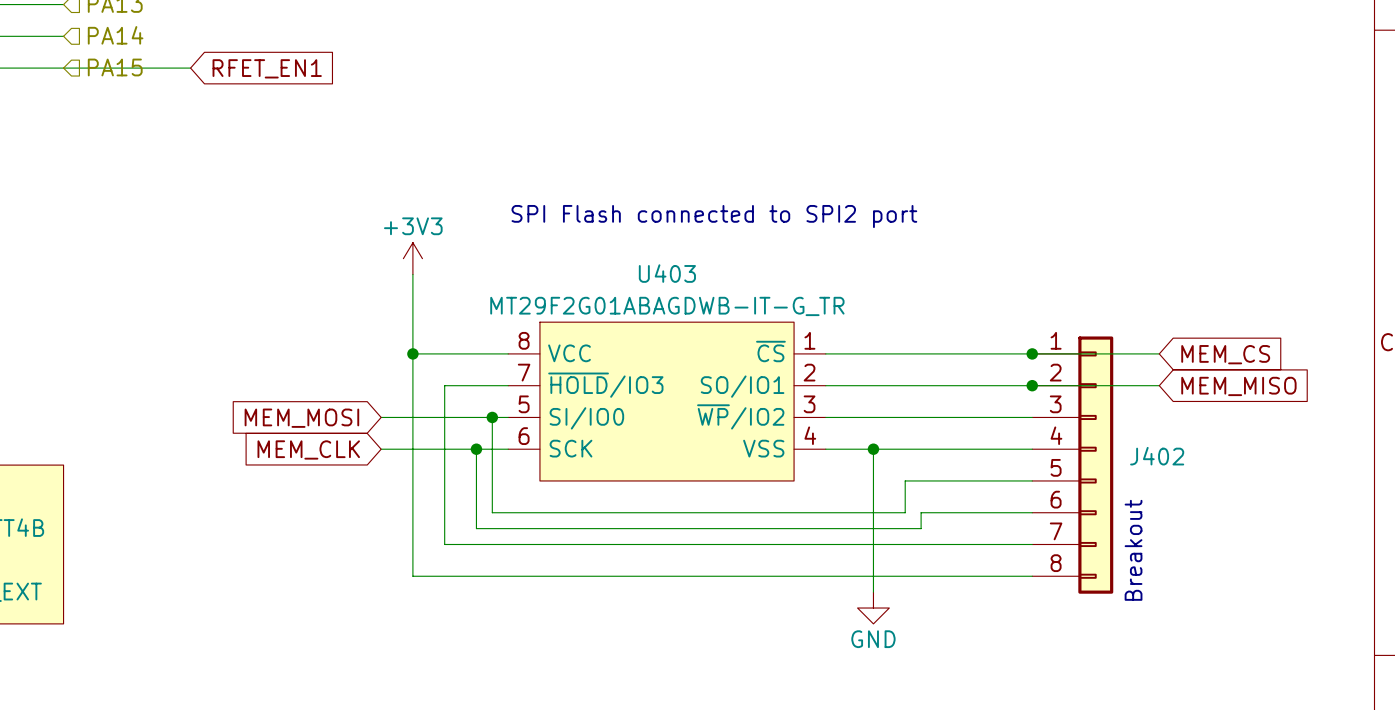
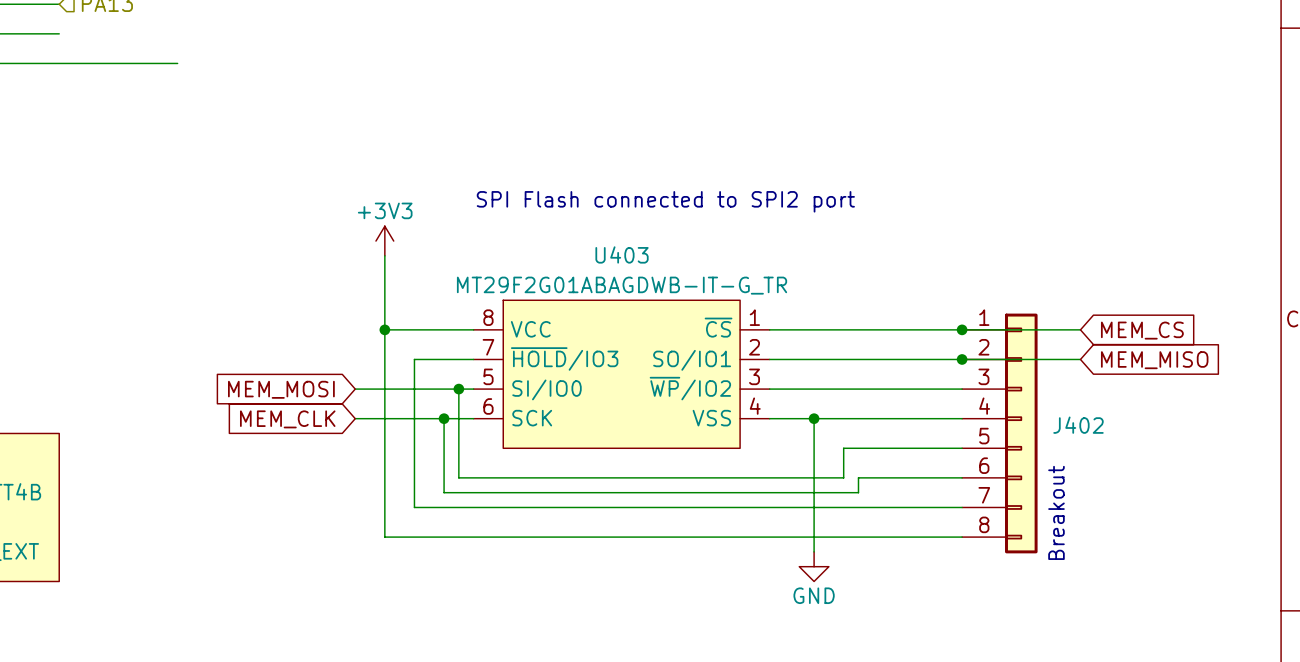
hierarchical label: PA14 (115, 35) -> none
hierarchical label: PA15 (115, 67) -> none
global label: RFET_EN1 (267, 68) -> none

